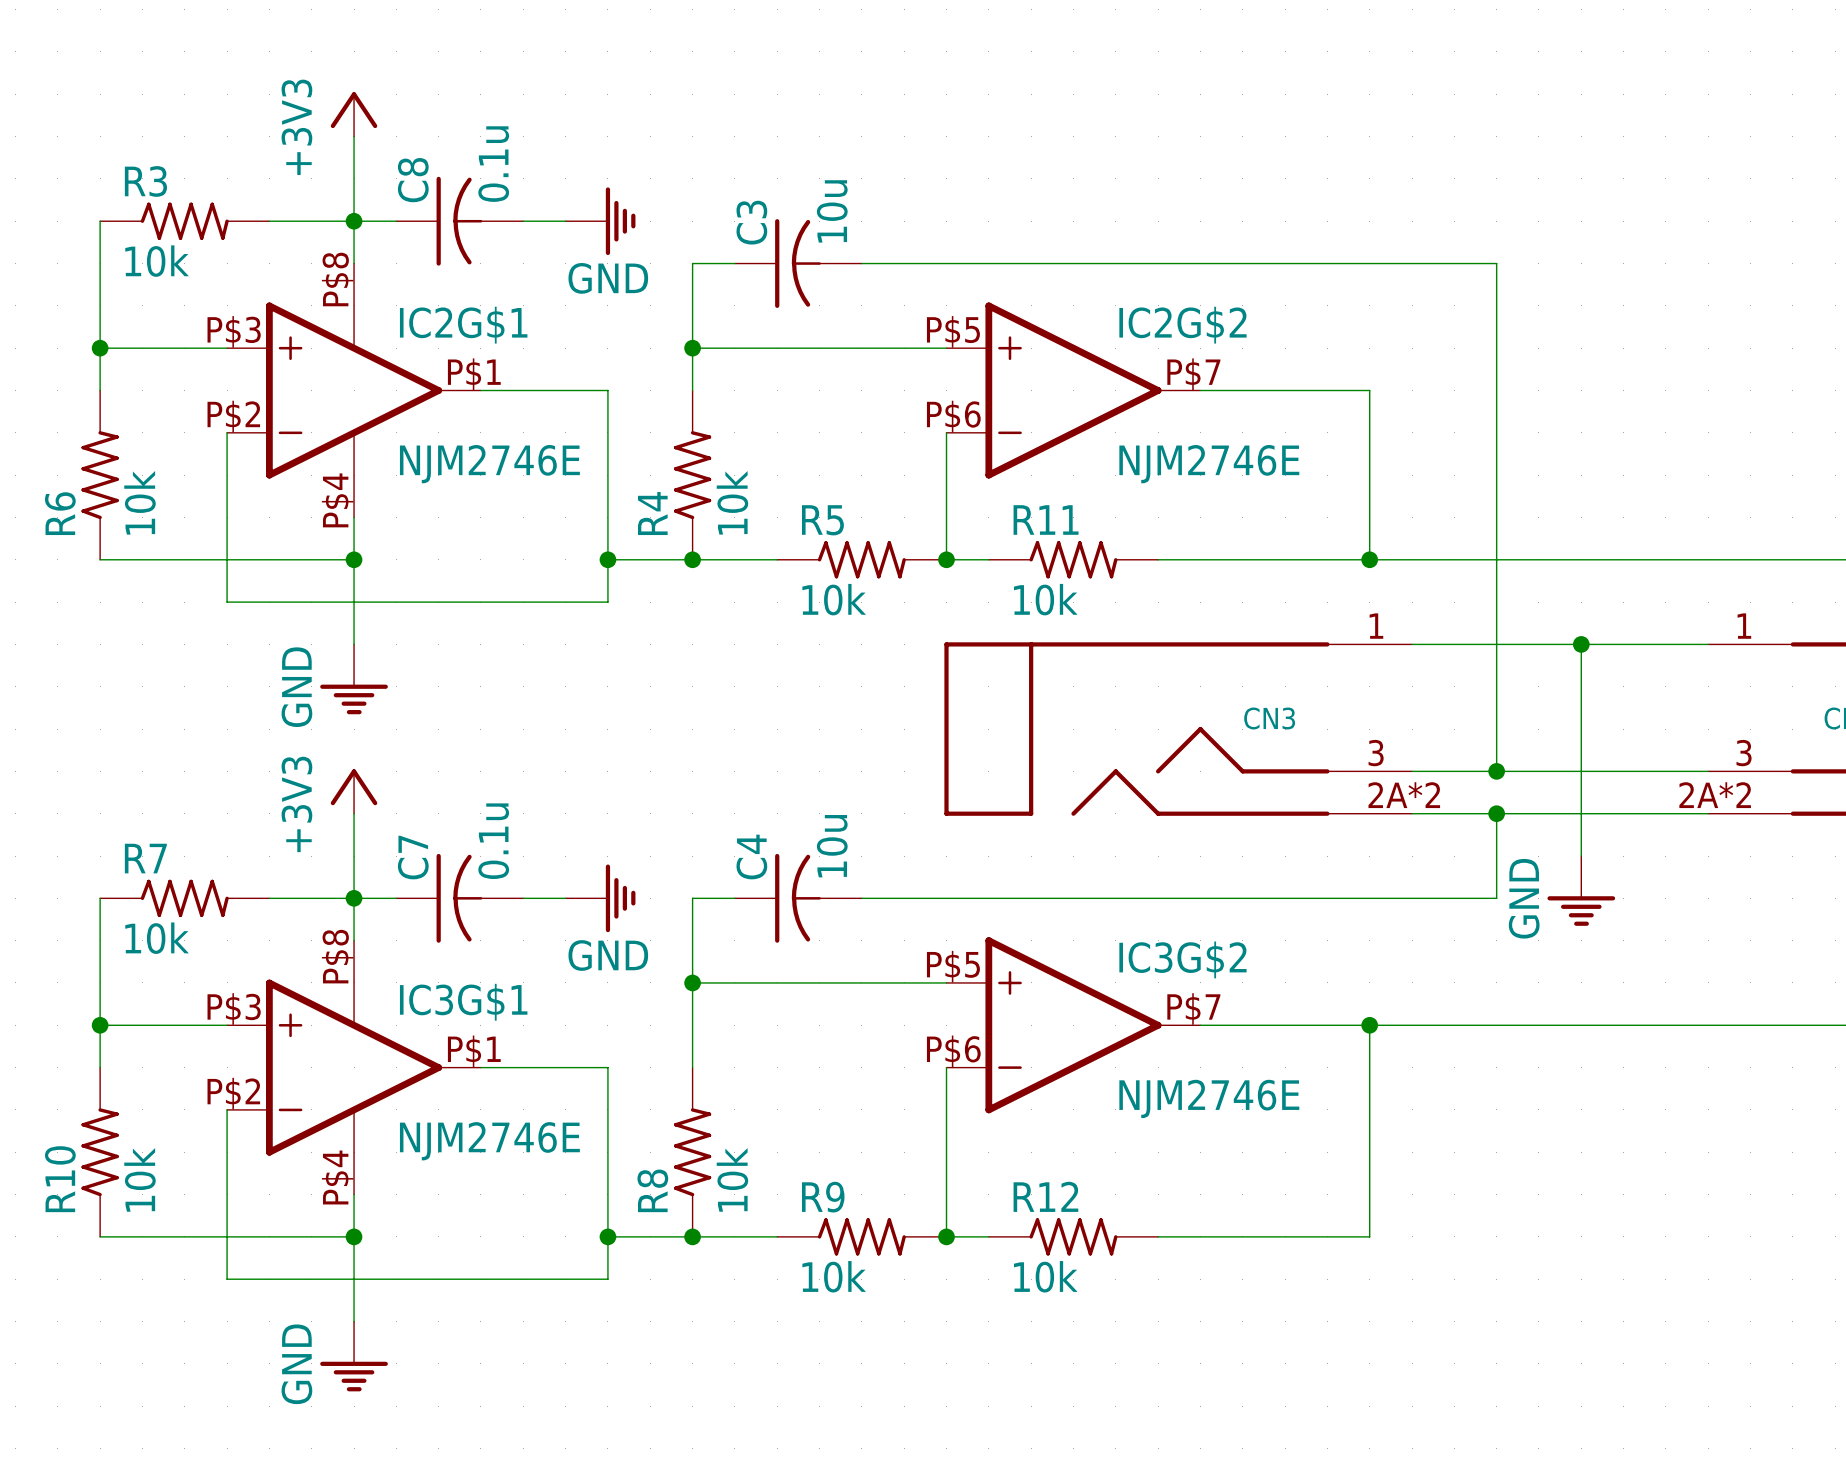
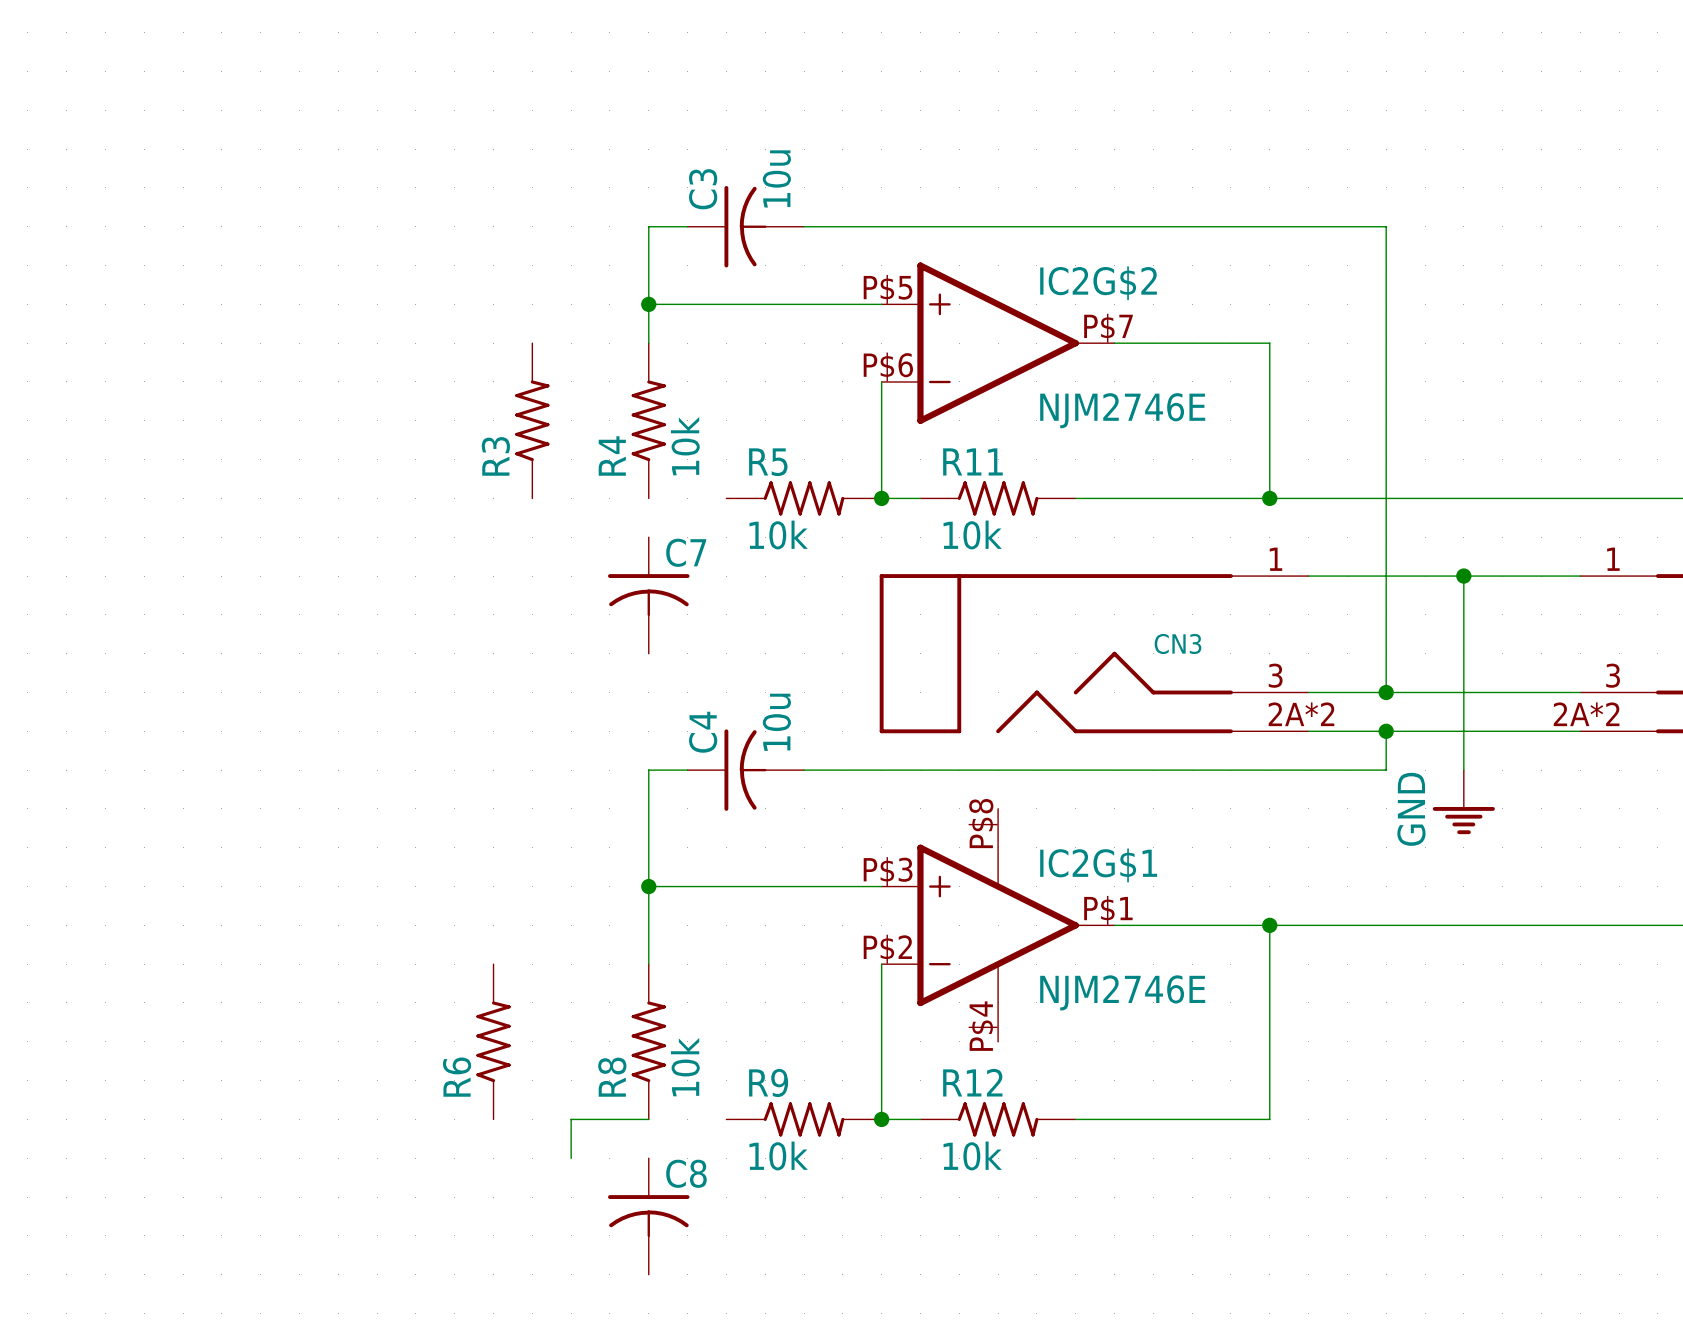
power symbol: +3V3 (354, 114) -> none
wire: (354, 136) (354, 263) -> none
C8 value: 0.1u (493, 164) -> none
wire: (100, 221) (100, 390) -> none
R3 rotation: 0° (184, 221) -> 90° counterclockwise (532, 420)
R3 position: (184, 221) -> (532, 420)
wire: (269, 221) (396, 221) -> none
junction: (354, 221) -> none
C8 rotation: 0° (459, 221) -> 90° clockwise (648, 1216)
C8 position: (459, 221) -> (648, 1216)
wire: (523, 221) (565, 221) -> none
power symbol: GND (600, 221) -> none
R3 value: 10k (157, 261) -> none
wire: (100, 348) (227, 348) -> none
junction: (100, 348) -> none
IC2G$1 position: (354, 390) -> (998, 925)
wire: (480, 390) (607, 390) (607, 602) (227, 602) (227, 432) -> none
R6 position: (100, 475) -> (493, 1041)
R6 value: 10k (139, 502) -> none
wire: (354, 517) (354, 644) -> none
wire: (100, 559) (354, 559) -> none
junction: (354, 559) -> none
wire: (607, 559) (777, 559) -> none
junction: (607, 559) -> none
junction: (692, 559) -> none
power symbol: GND (354, 679) -> none
power symbol: +3V3 (354, 791) -> none
wire: (354, 813) (354, 940) -> none
C7 value: 0.1u (493, 841) -> none
wire: (1496, 856) (1496, 898) (861, 898) -> (1386, 770) (804, 770)
wire: (100, 898) (100, 1067) -> none
R7: 10k (184, 898) -> none
wire: (269, 898) (396, 898) -> none
junction: (354, 898) -> none
C7 rotation: 0° (459, 898) -> 90° clockwise (648, 595)
C7 position: (459, 898) -> (648, 595)
wire: (523, 898) (565, 898) -> none
power symbol: GND (600, 898) -> none
wire: (692, 898) (734, 898) -> (648, 808) (648, 770) (687, 770)
C4 position: (798, 898) -> (745, 770)
wire: (100, 1025) (227, 1025) -> none
junction: (100, 1025) -> none
IC3G$2: NJM2746E (1073, 1025) -> none
IC3G$1: NJM2746E (354, 1067) -> none
wire: (480, 1067) (607, 1067) (607, 1236) -> none
wire: (227, 1109) (227, 1279) (607, 1279) -> none
R10: 10k (100, 1152) -> none
wire: (354, 1194) (354, 1321) -> none
wire: (100, 1236) (354, 1236) -> none
junction: (354, 1236) -> none
junction: (607, 1236) -> none
wire: (692, 1236) (777, 1236) -> none
junction: (692, 1236) -> none
power symbol: GND (354, 1356) -> none

